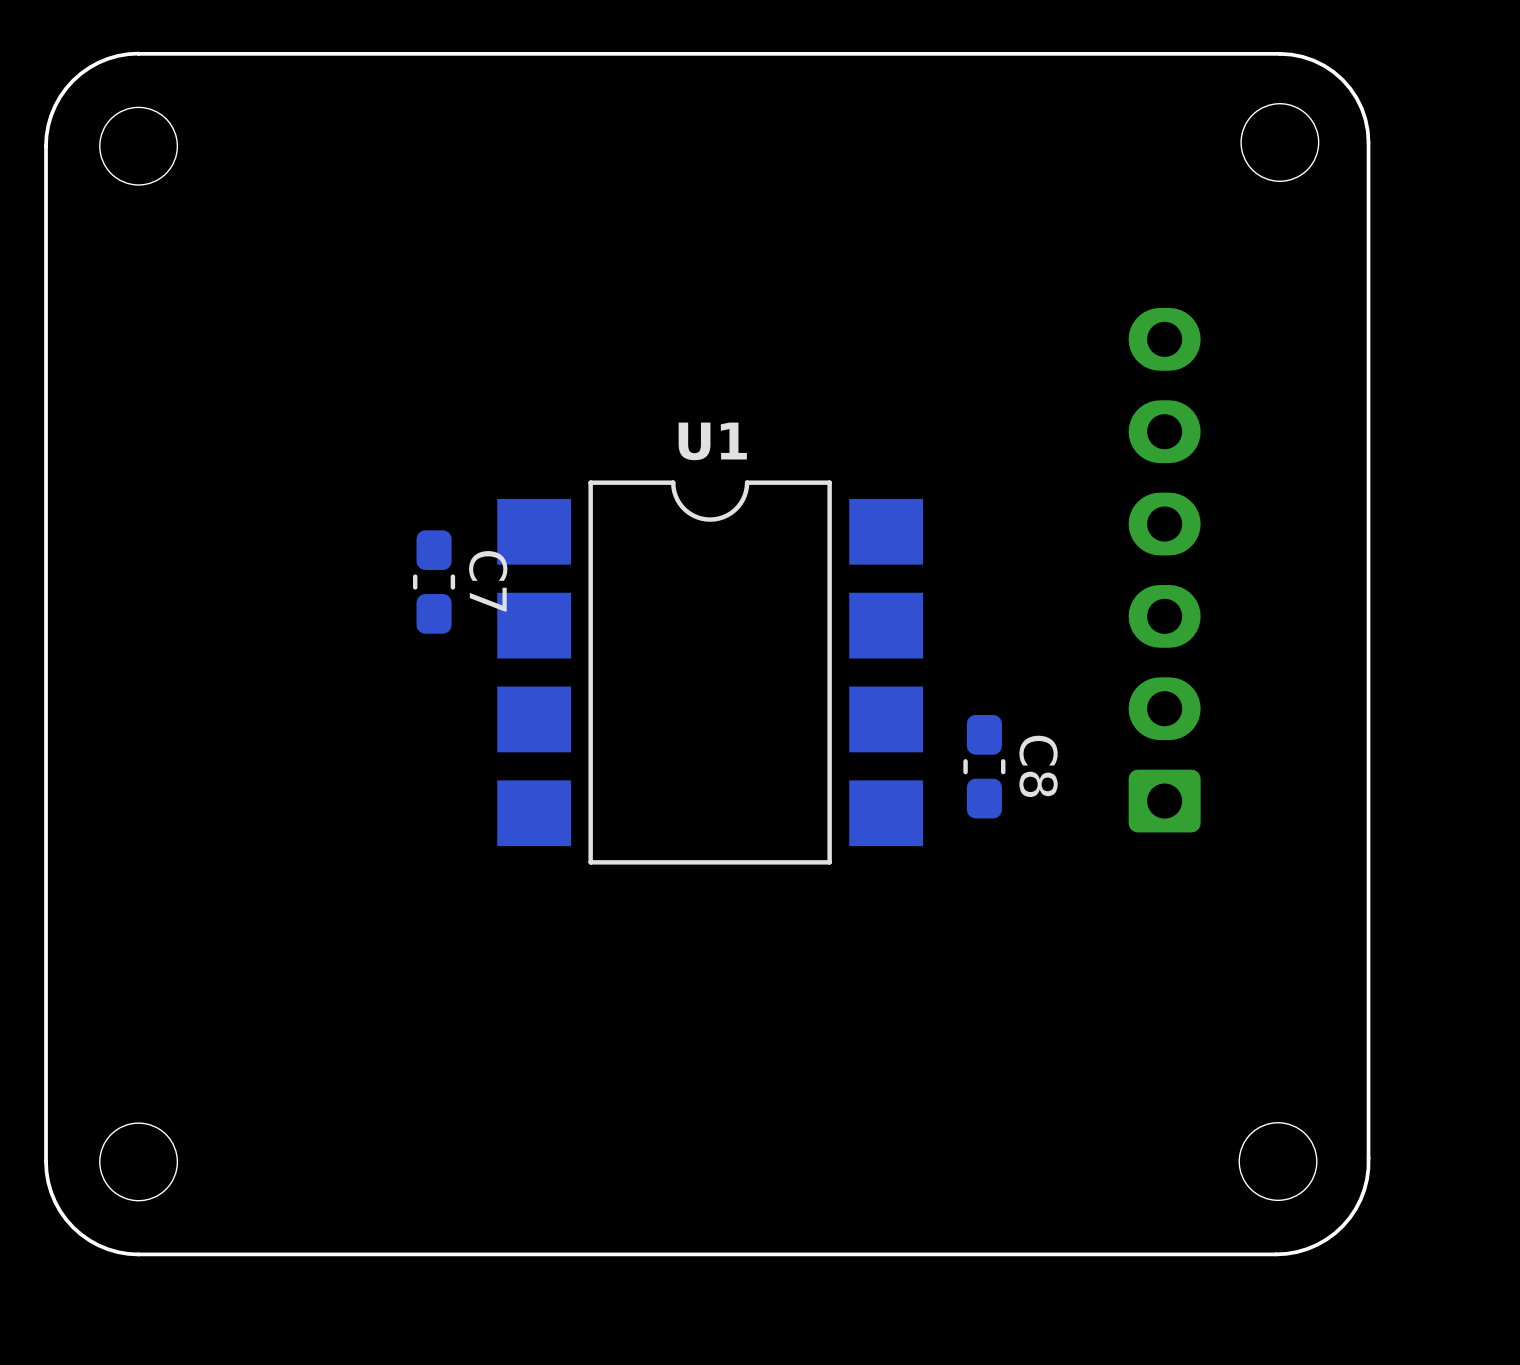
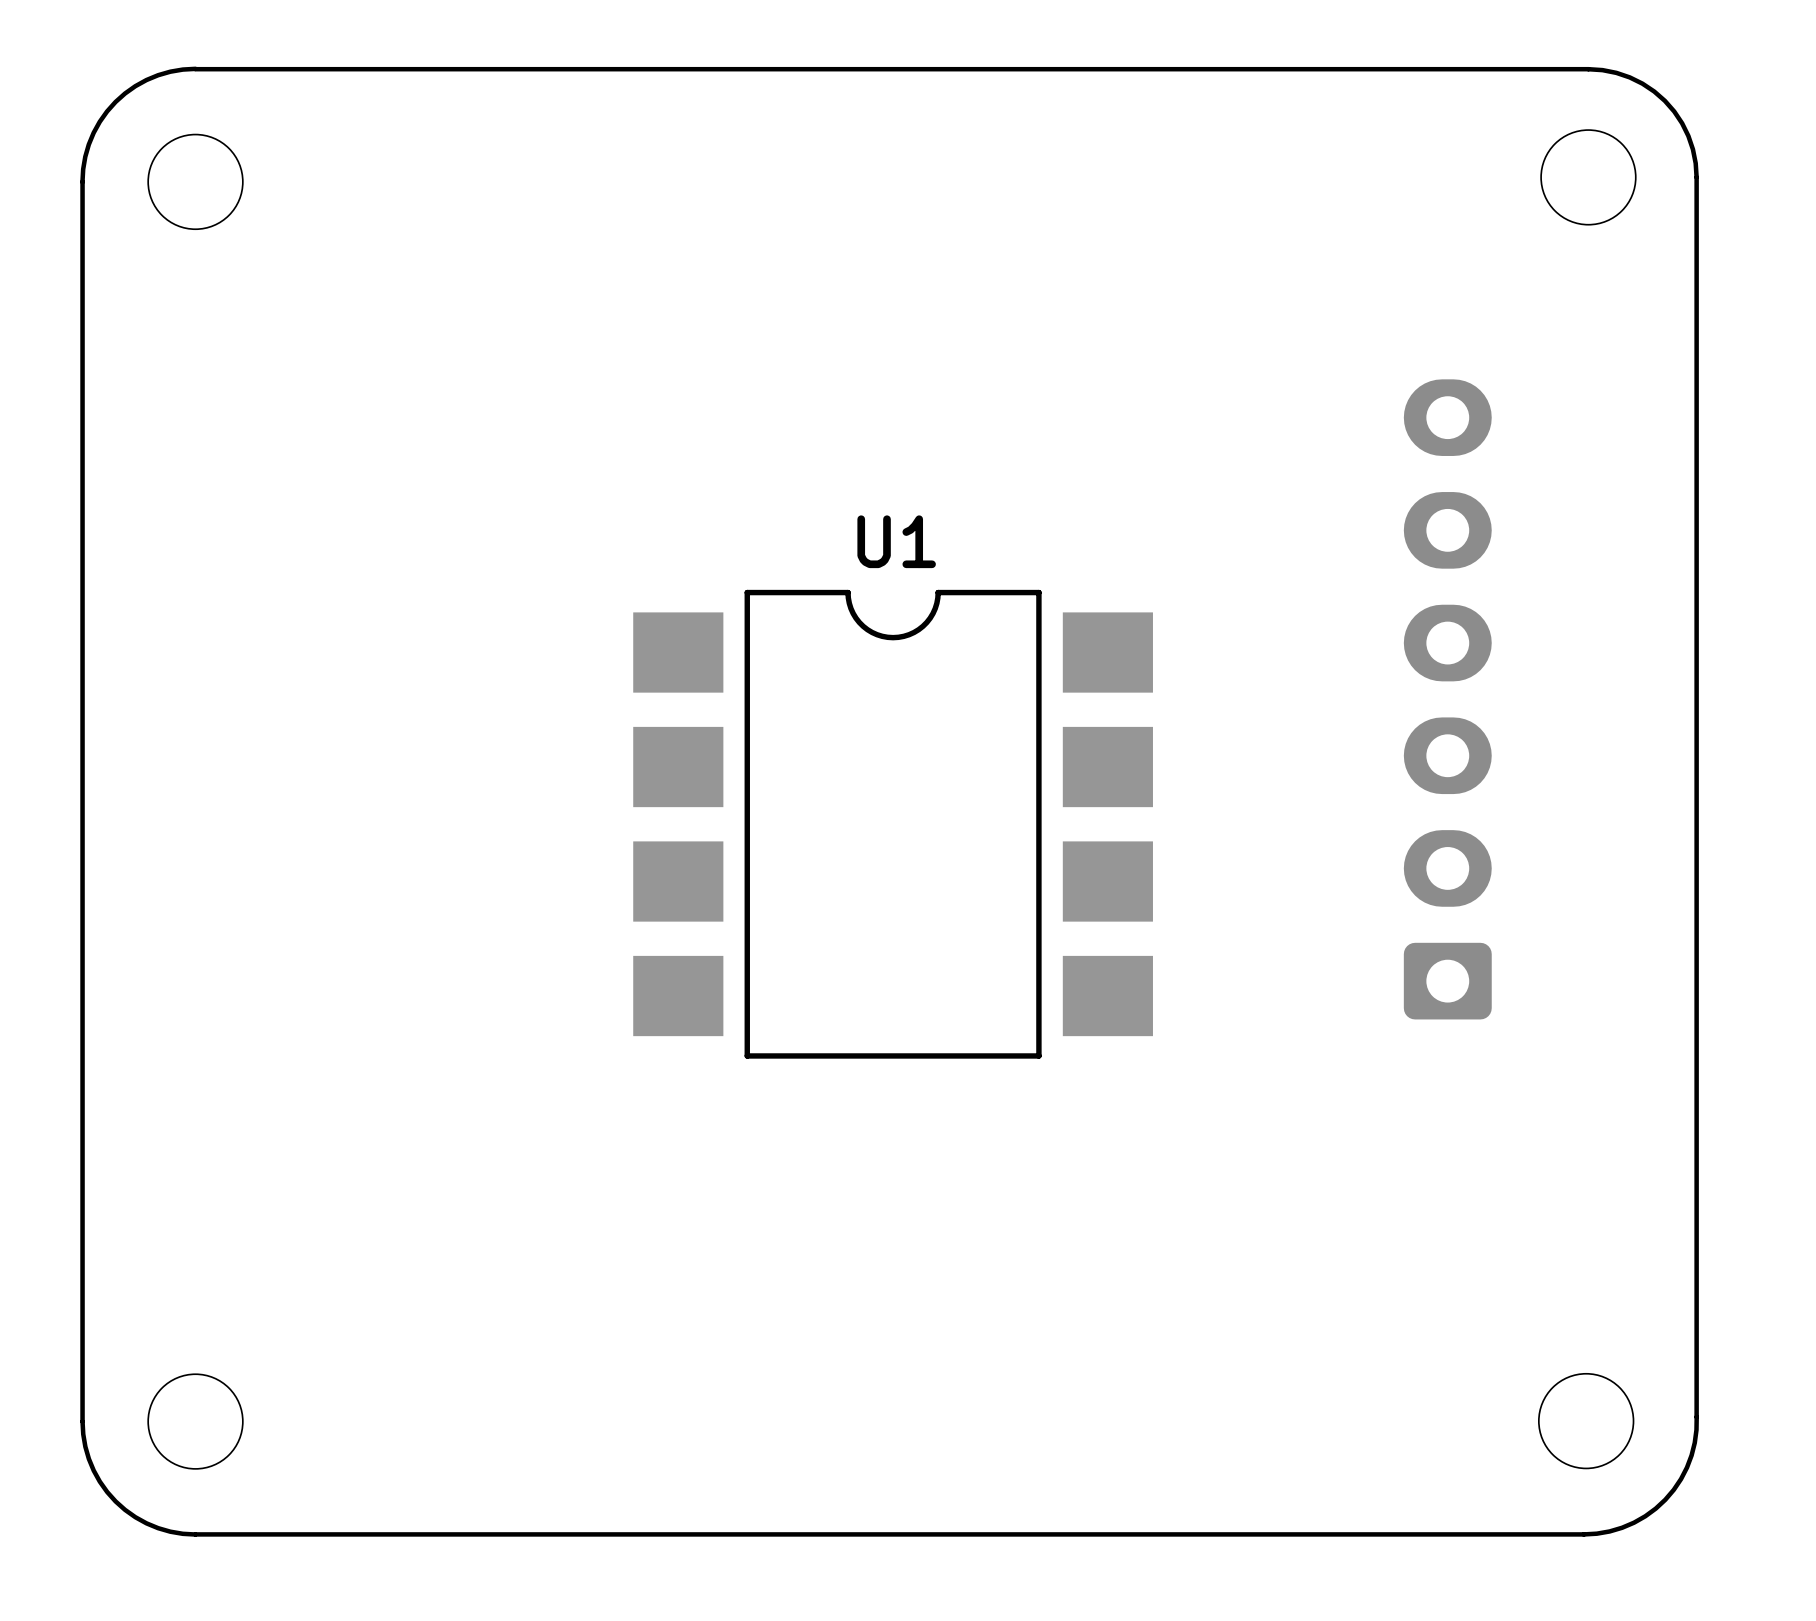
C7: (434, 582) -> none
C8: (984, 766) -> none

